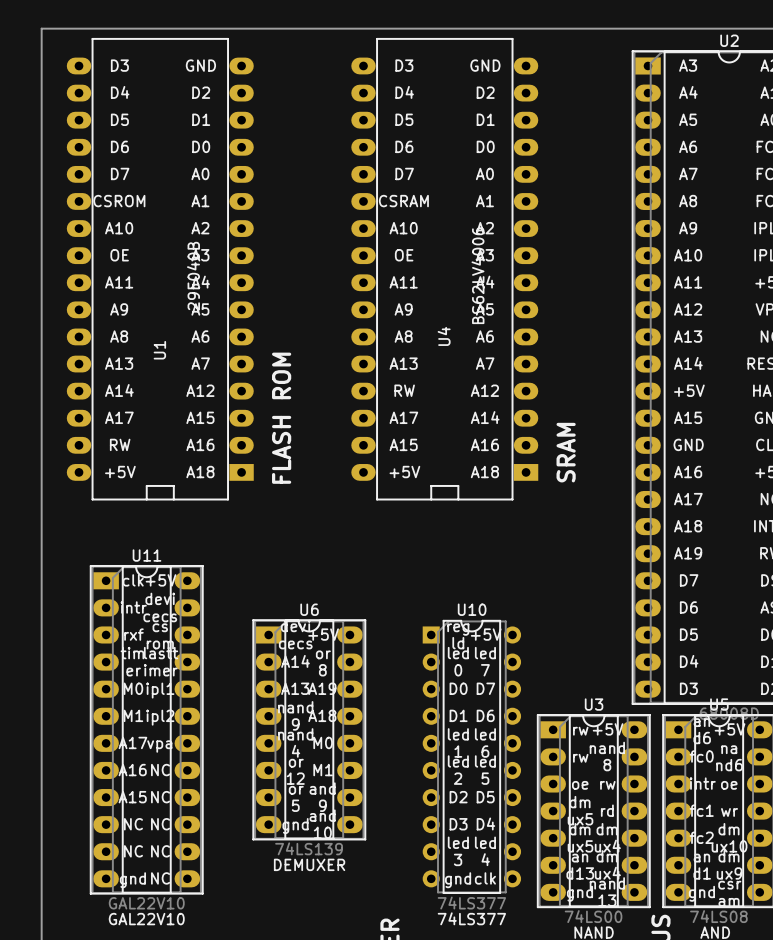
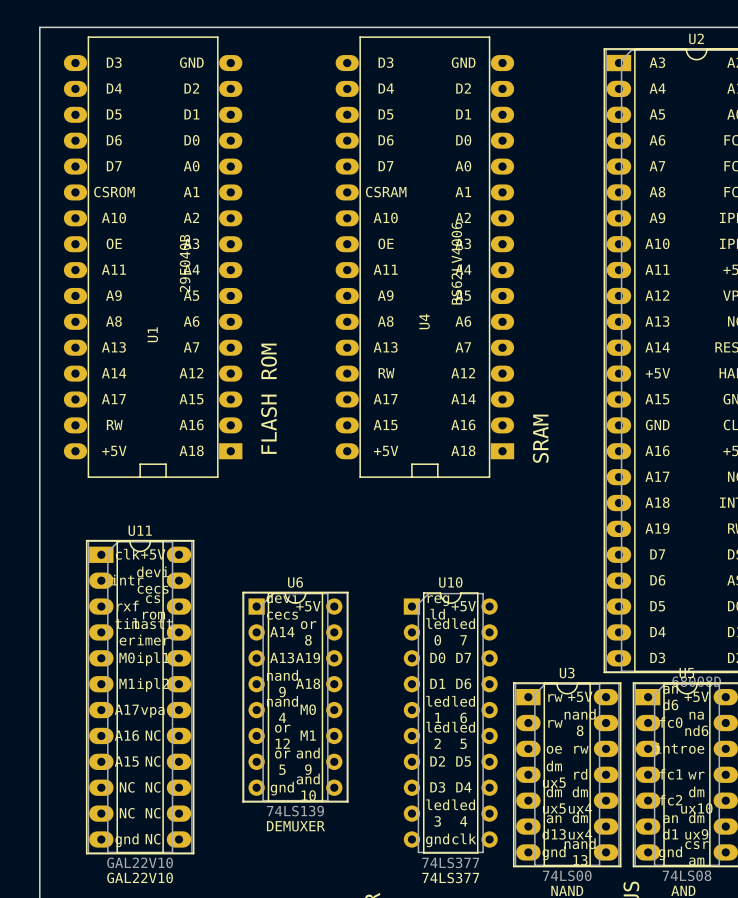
U6 footprint: [252, 619, 366, 841] -> [242, 591, 349, 803]

